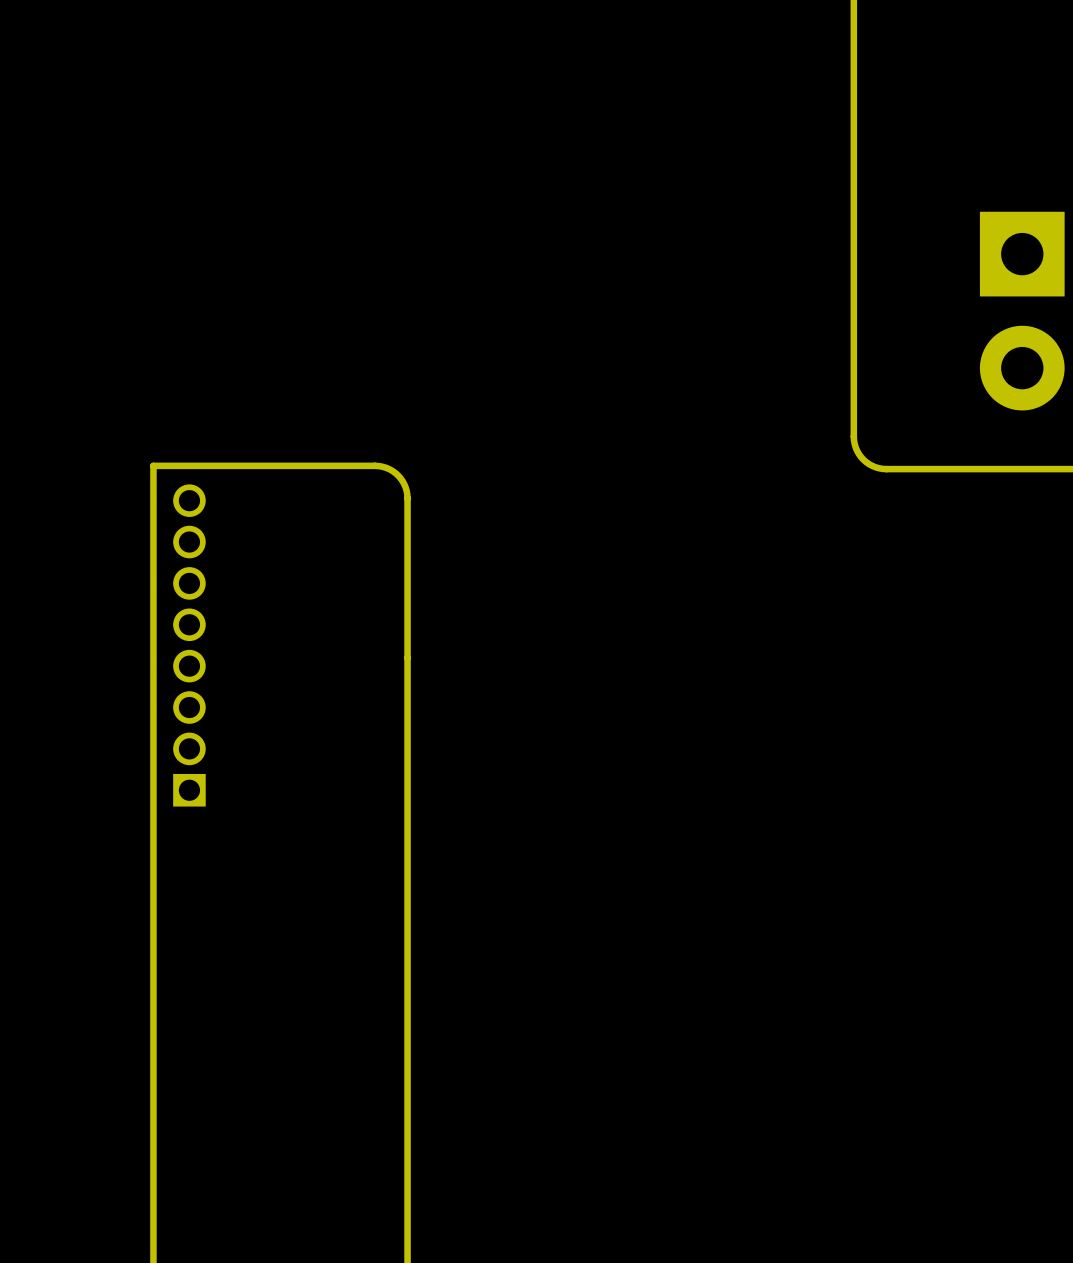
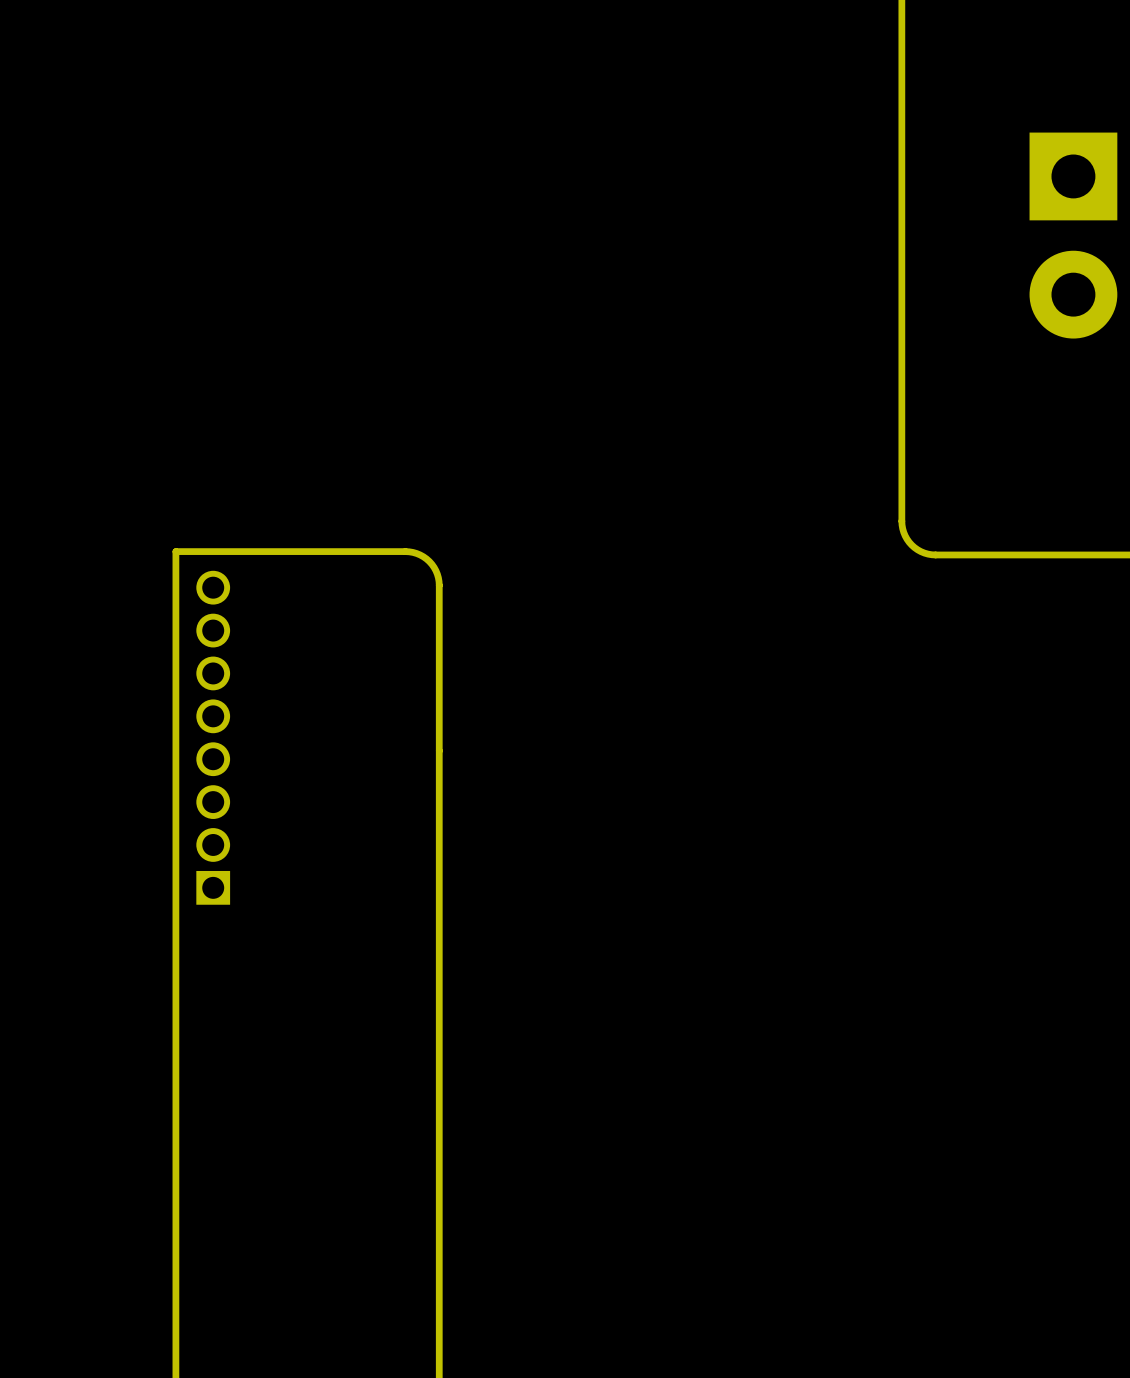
part position: (1022, 311) -> (1073, 235)

